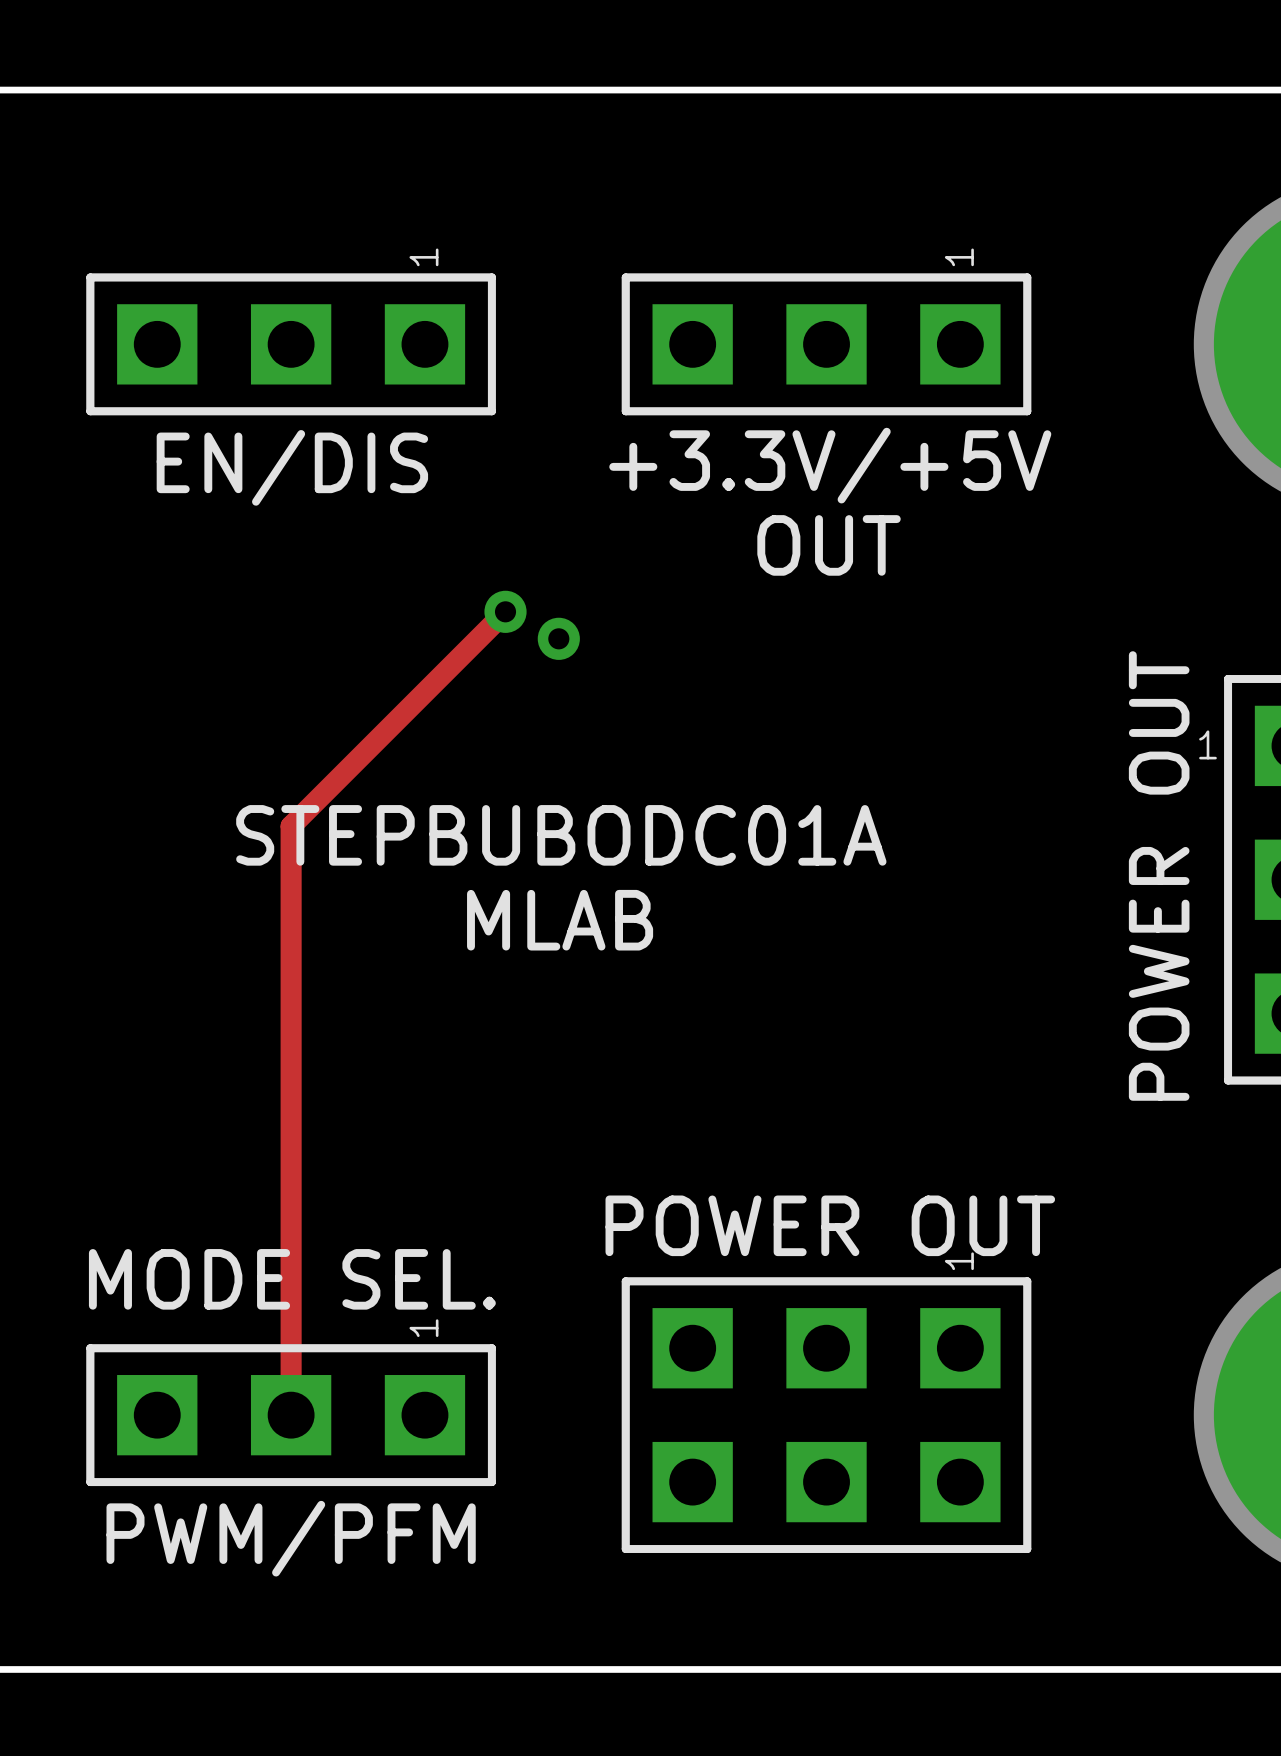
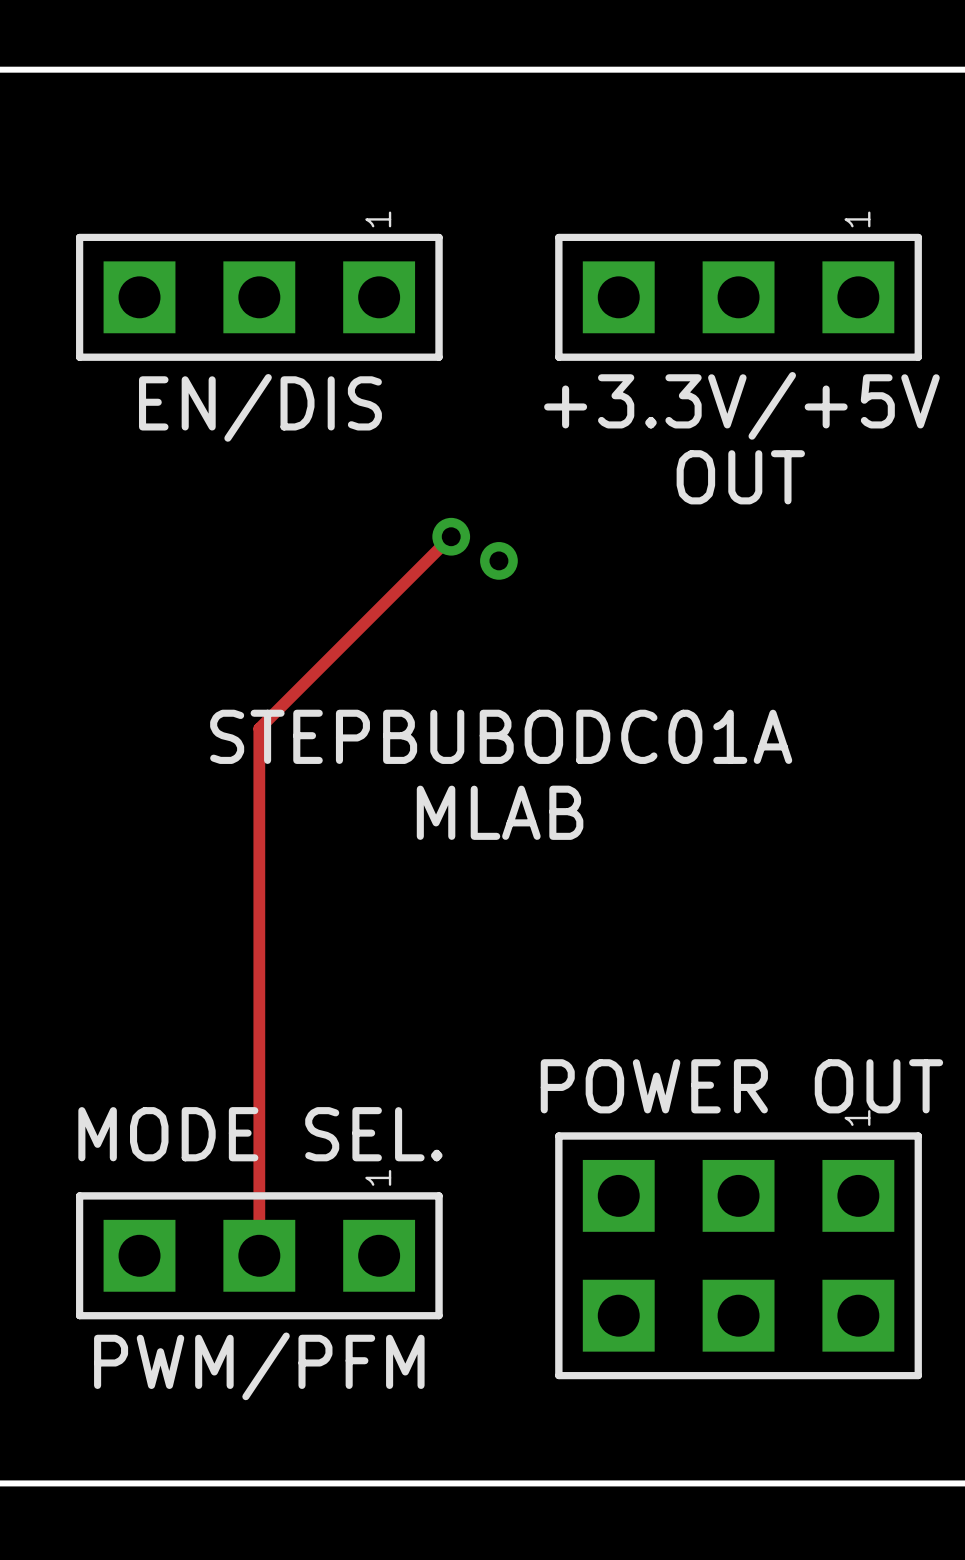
track width: thick (505, 611) (291, 826) (291, 1415) -> thin (451, 536) (259, 728) (259, 1255)

